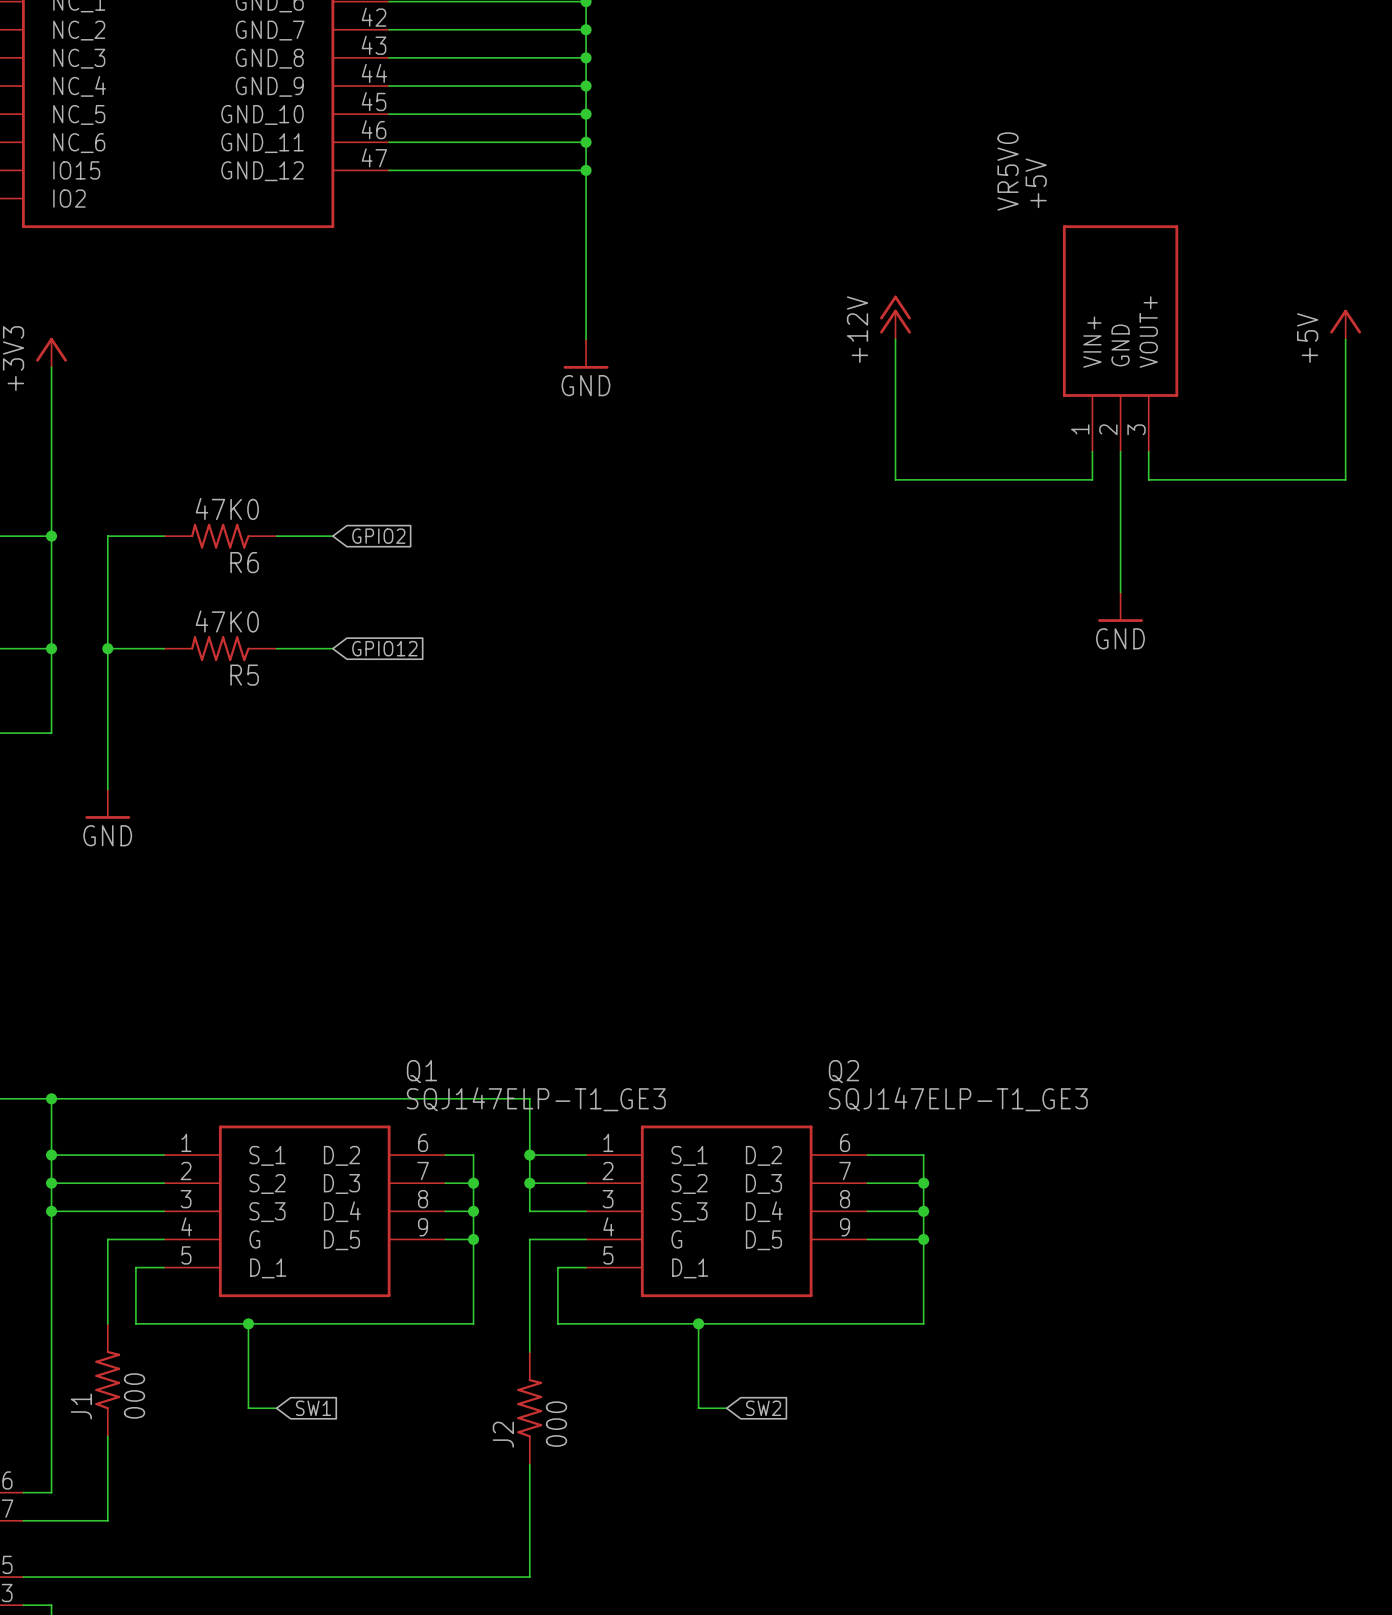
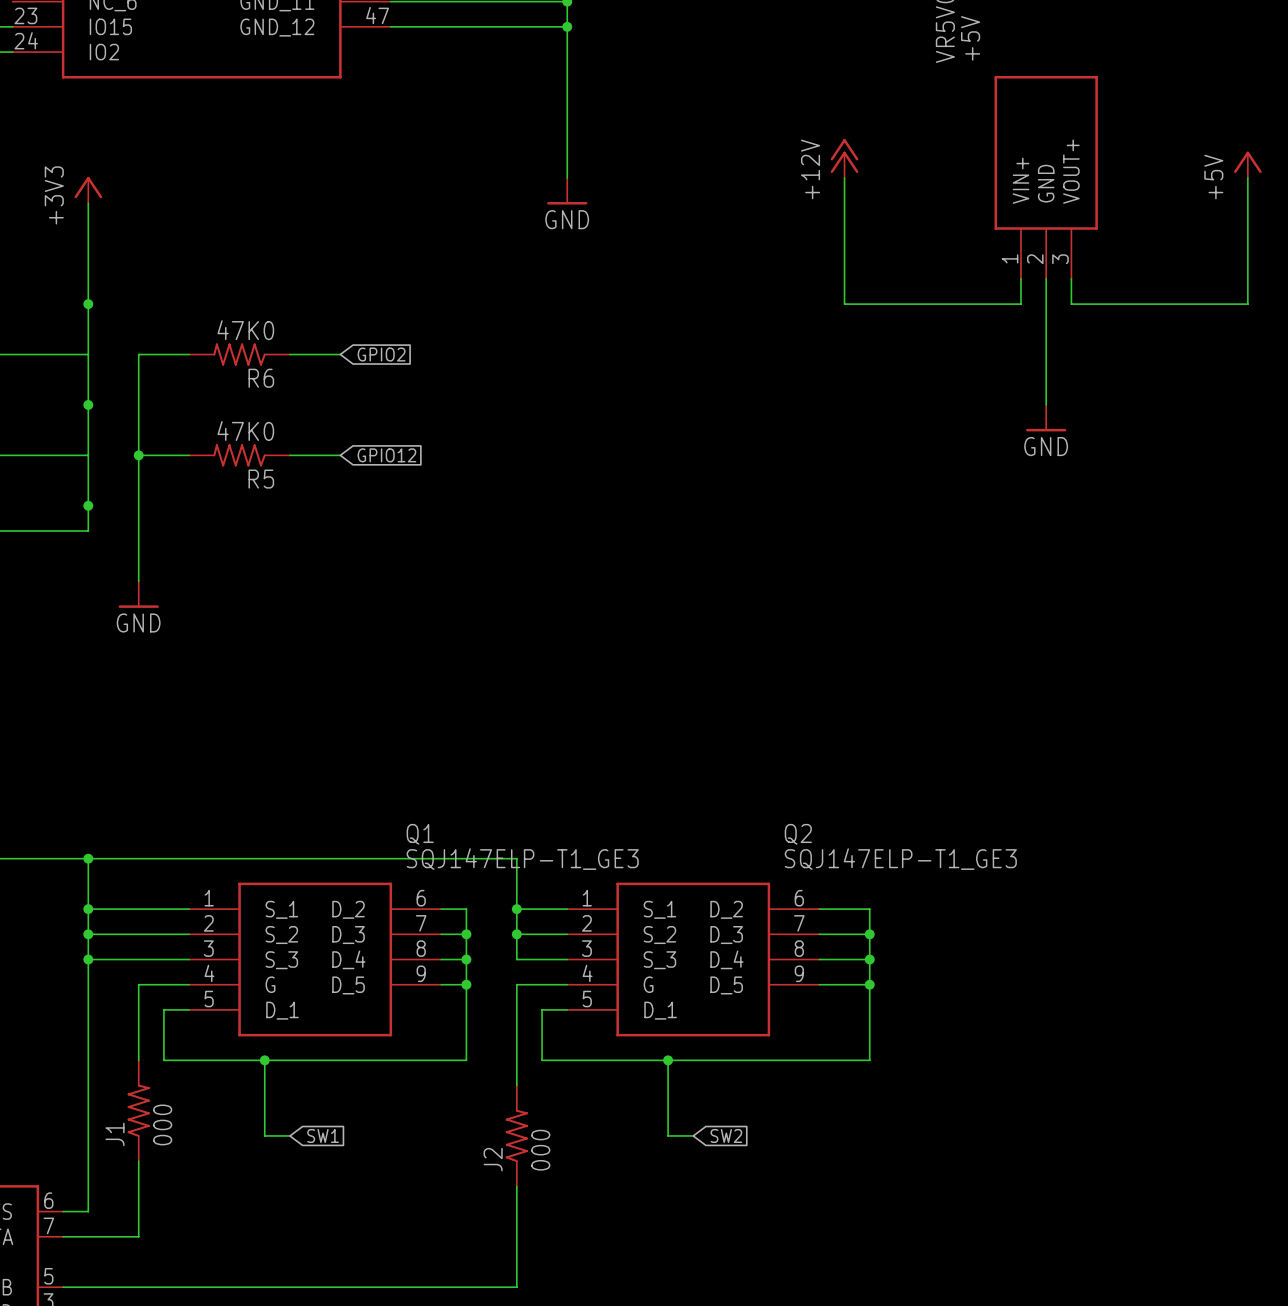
junction: none -> (88, 304)
junction: (51, 536) -> none
junction: none -> (88, 404)
junction: (51, 648) -> none
junction: none -> (88, 505)

